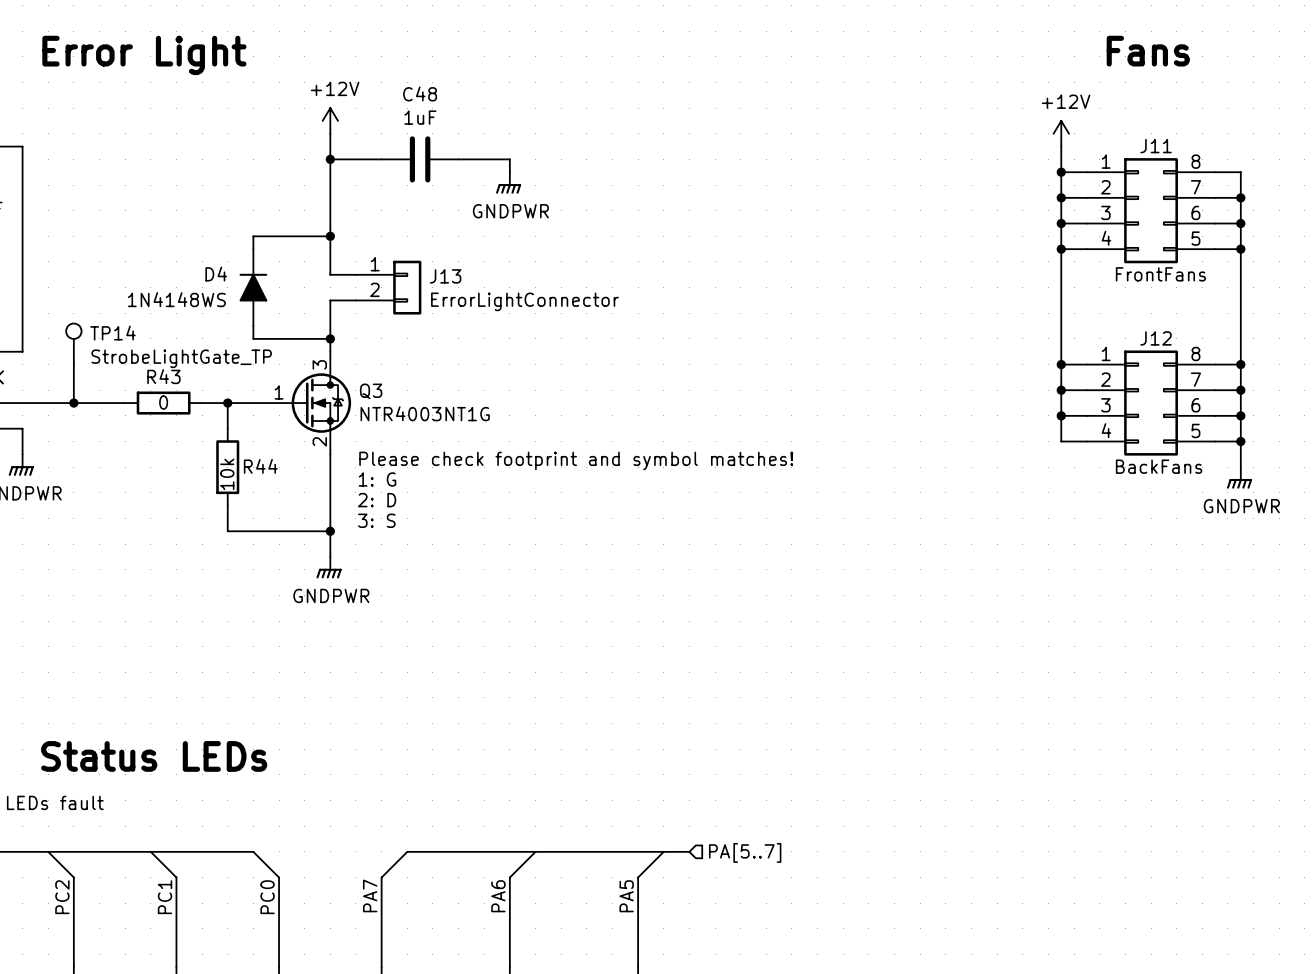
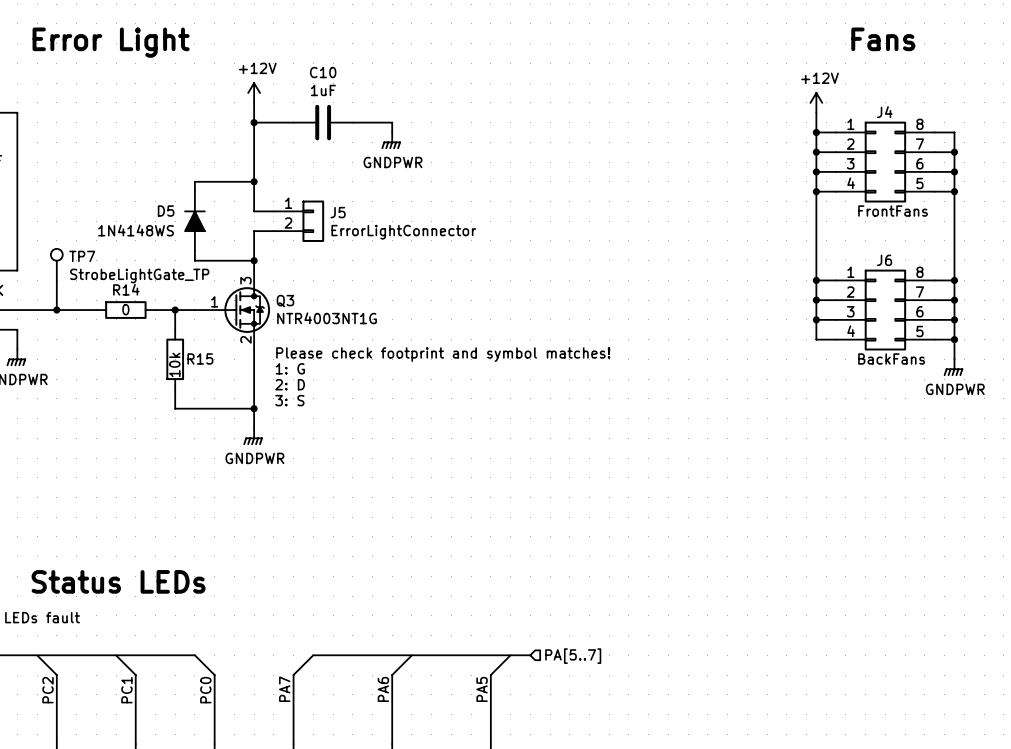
C48 name: C48 (420, 93) -> C10 (323, 72)
J11 name: J11 (1156, 146) -> J4 (884, 112)
D4 name: D4 (216, 274) -> D5 (166, 211)
J13 name: J13 (445, 276) -> J5 (338, 212)
TP14 name: TP14 (112, 333) -> TP7 (82, 256)
J12 name: J12 (1156, 338) -> J6 (884, 260)
R43 name: R43 (163, 376) -> R14 (126, 289)
R44 name: R44 (260, 466) -> R15 (200, 358)

